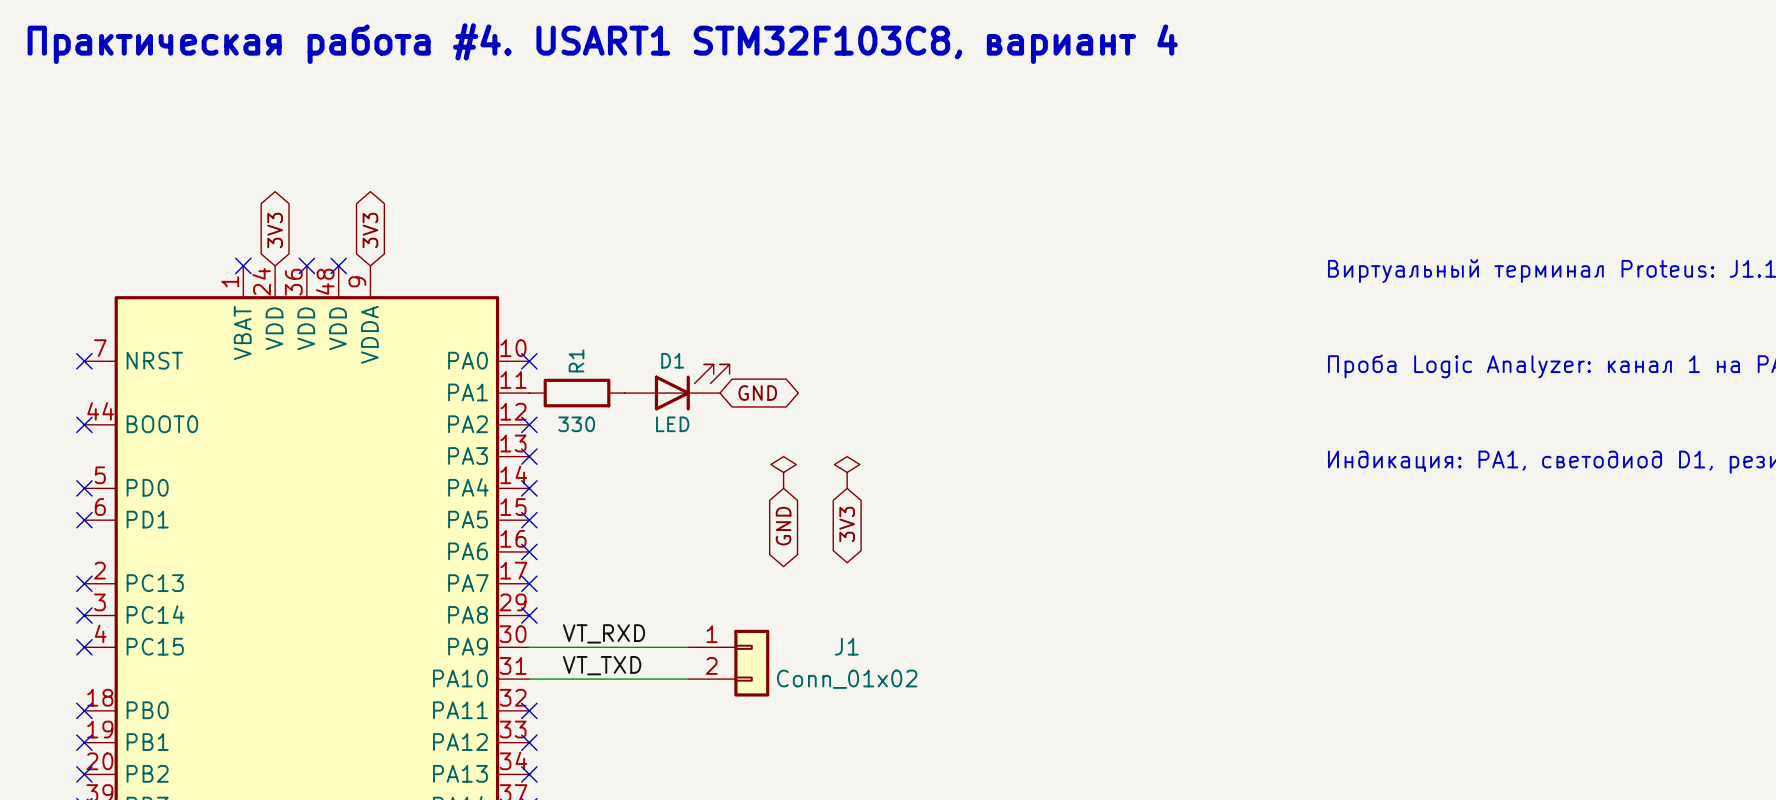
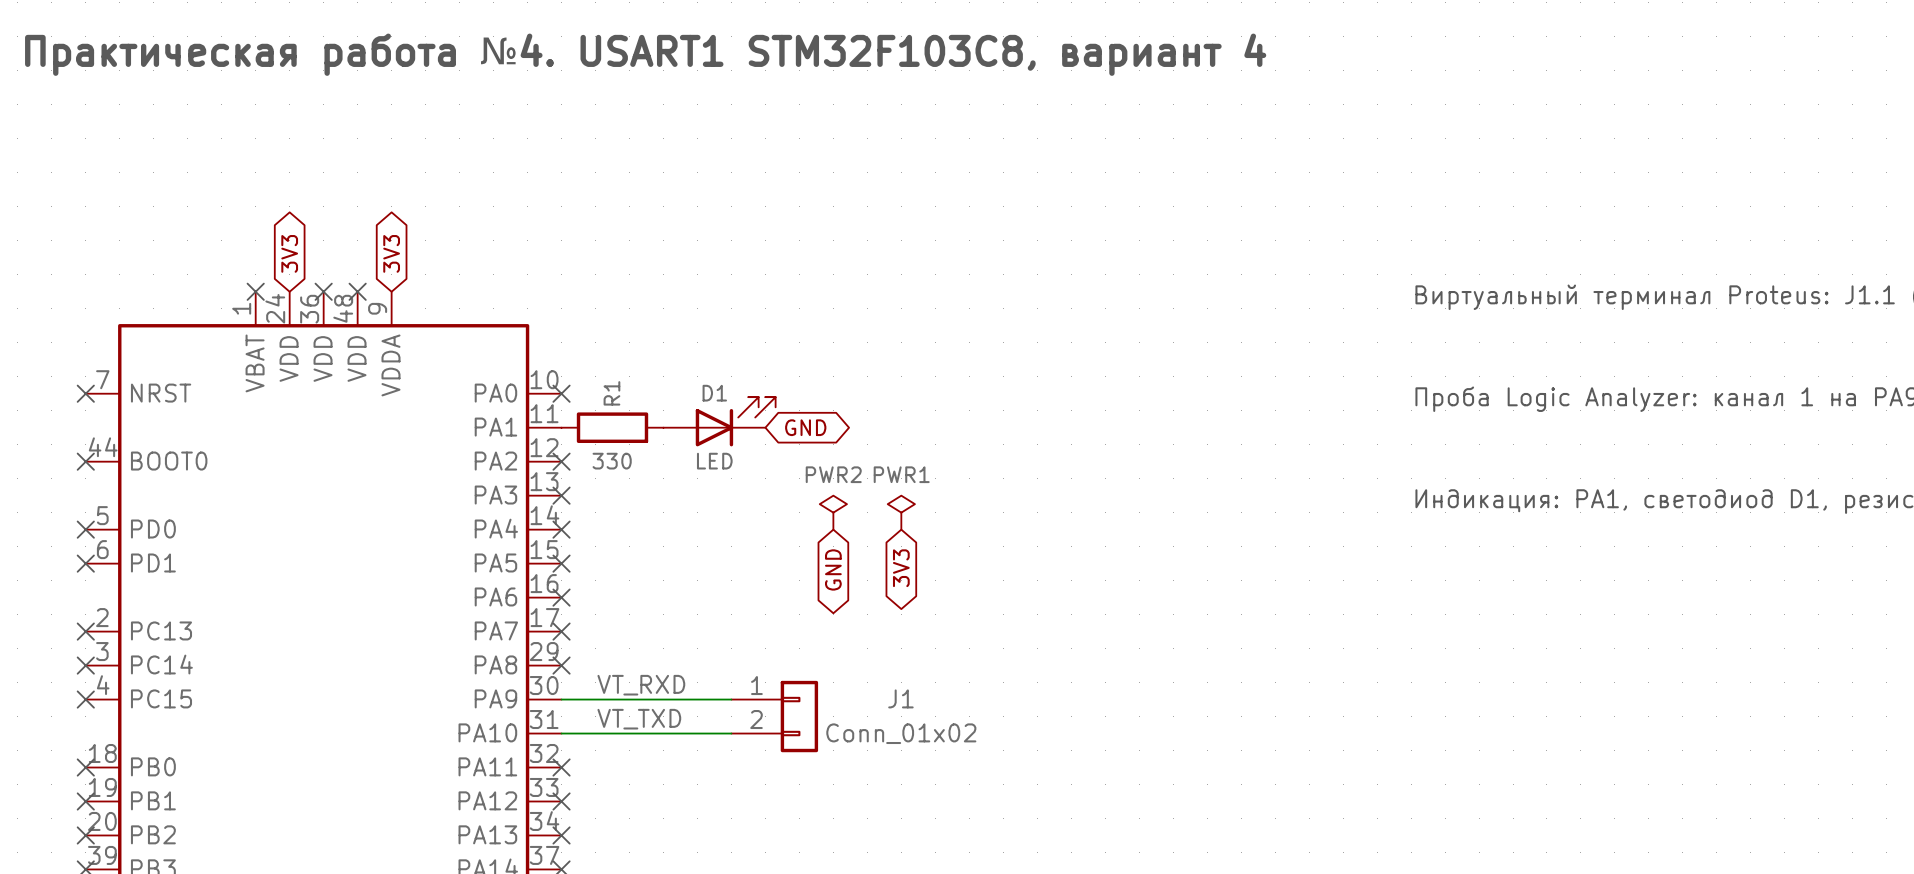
text: Практическая работа #4. USART1 STM32F103C8, вариант 4 (602, 43) -> Практическая работа №4. USART1 STM32F103C8, вариант 4 (645, 54)
PWR2 name: none -> PWR2 (833, 474)
PWR1 name: none -> PWR1 (901, 474)

